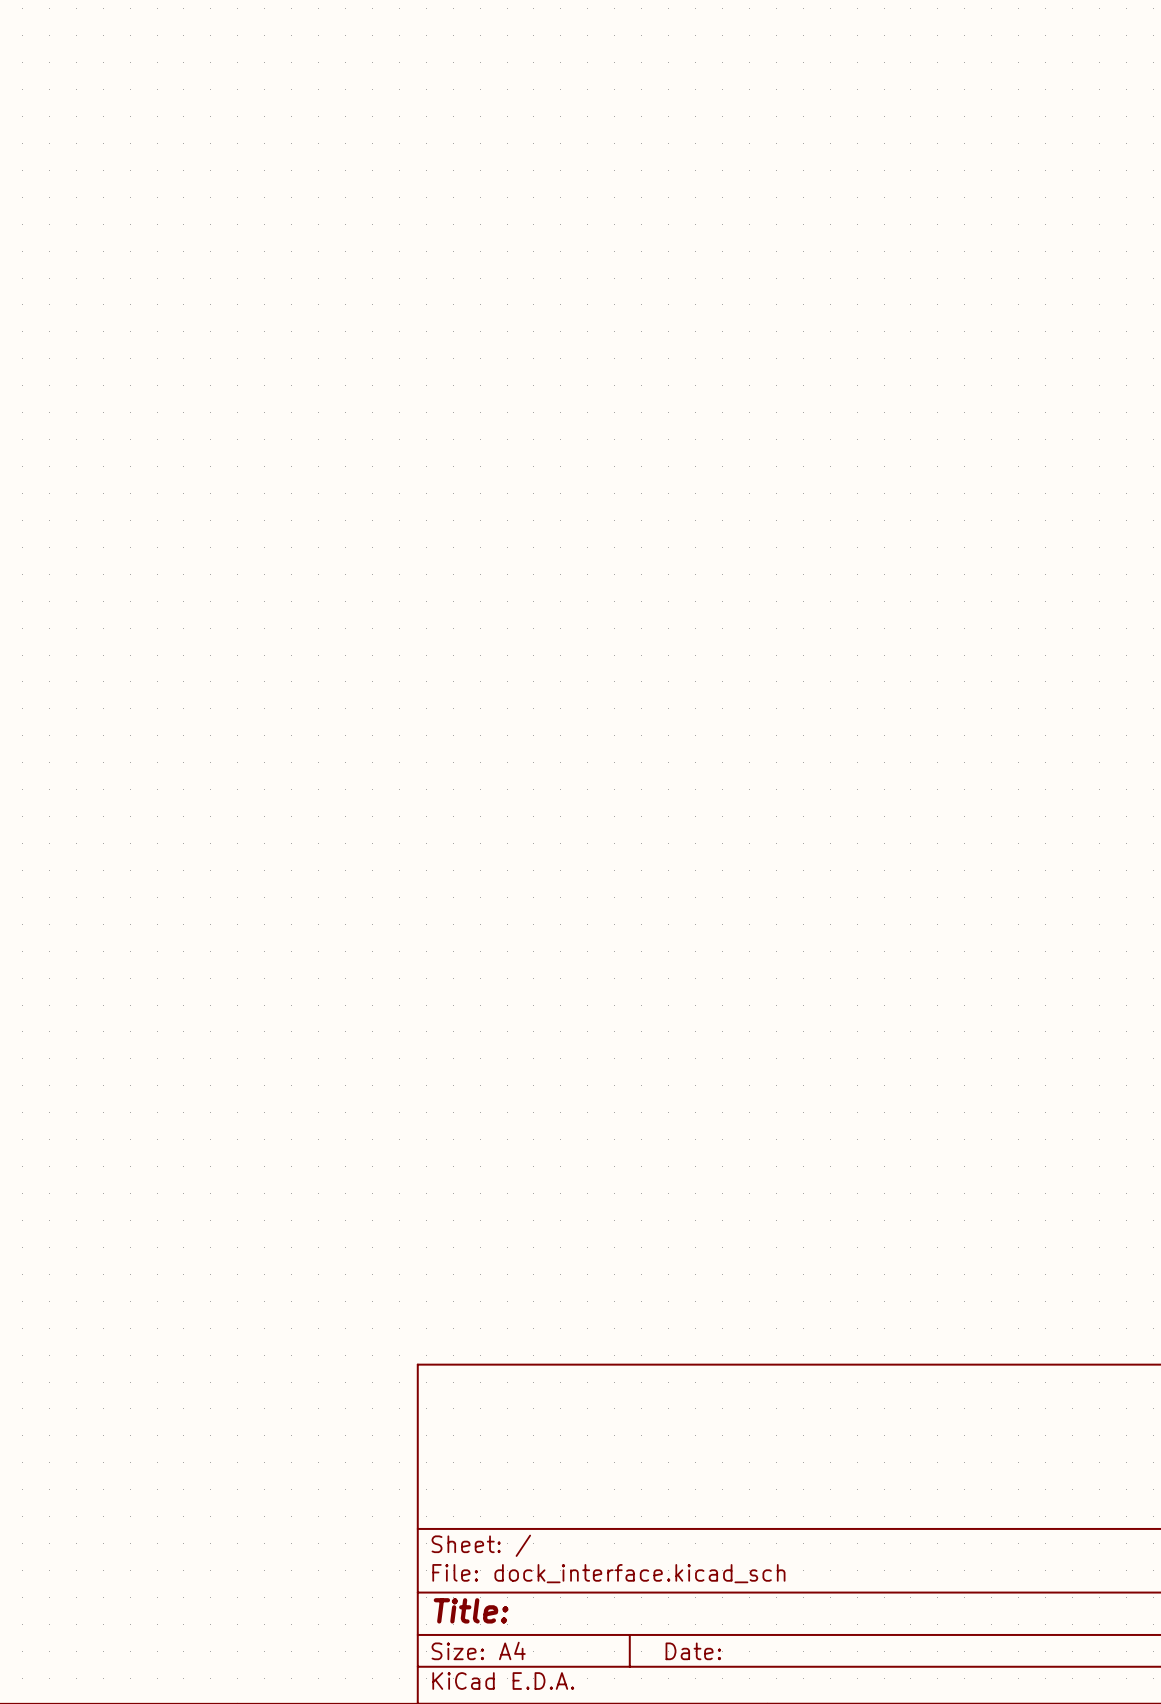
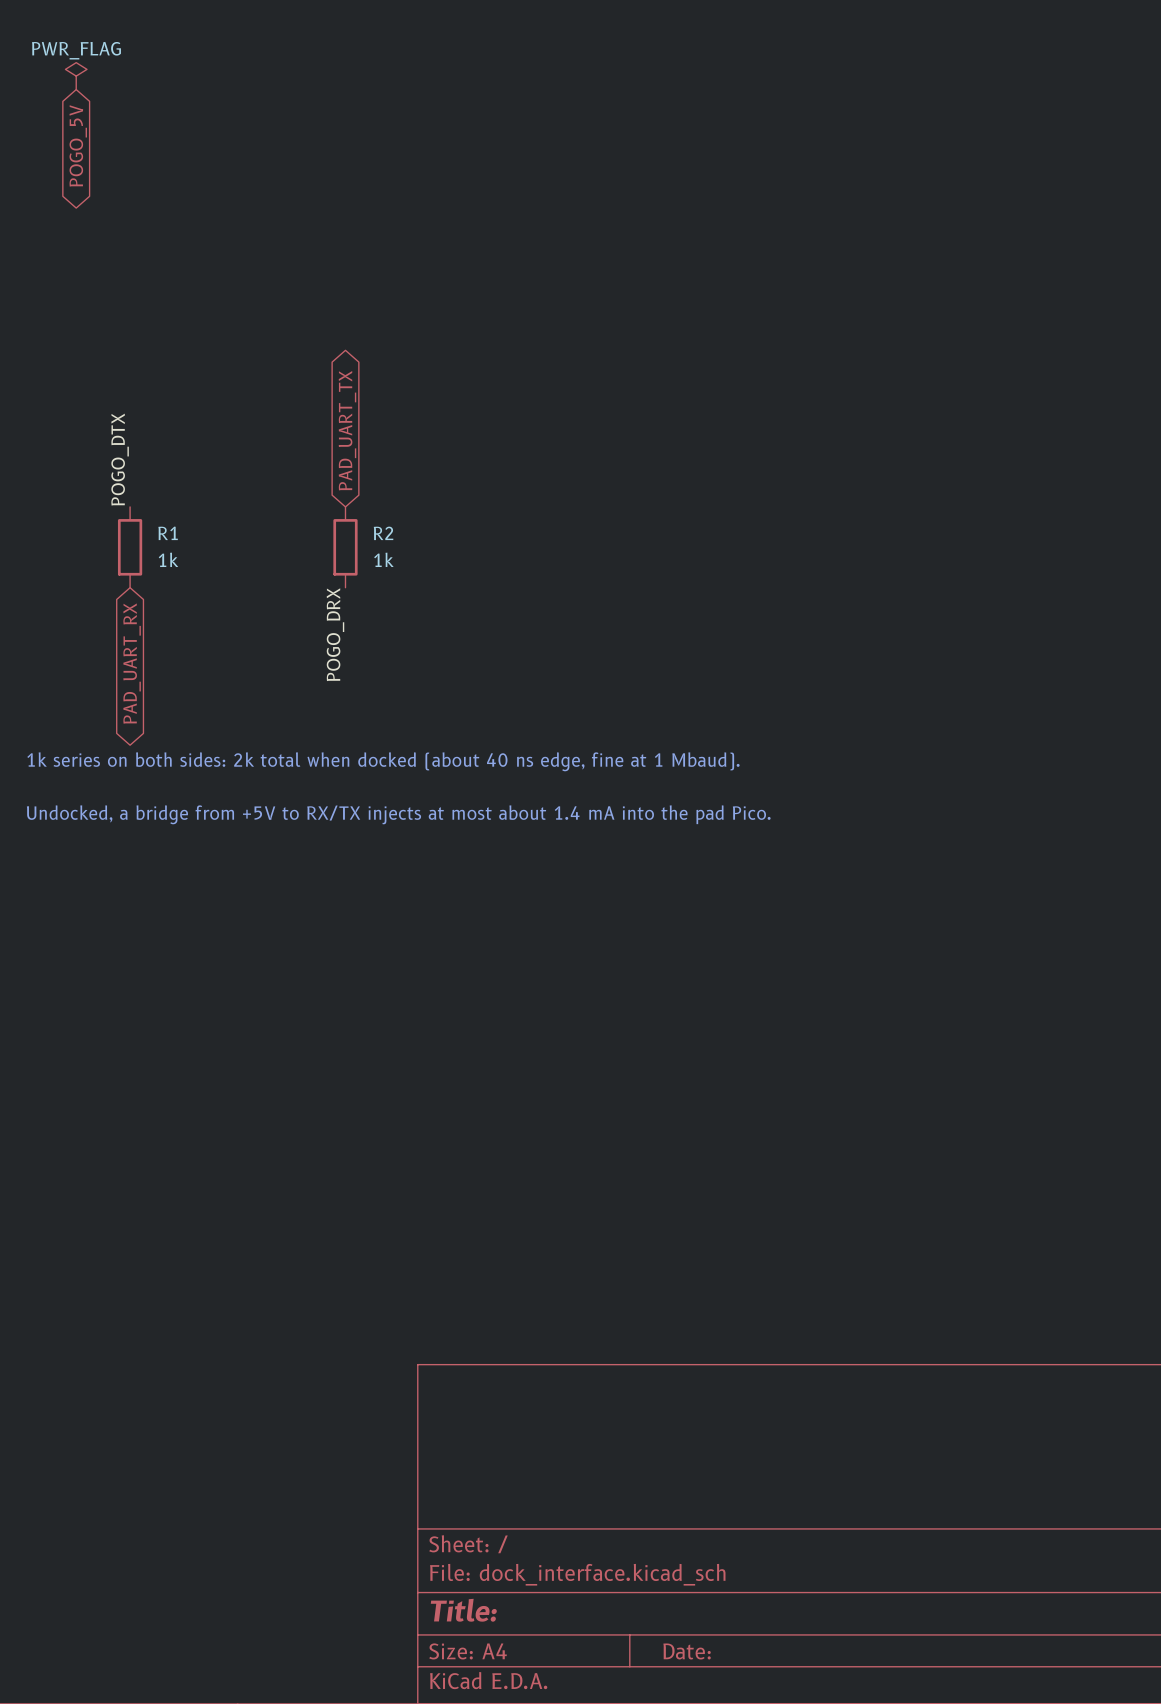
power symbol: none -> PWR_FLAG (76, 76)
global label: none -> POGO_5V (78, 145)
global label: none -> PAD_UART_TX (347, 430)
label: none -> POGO_DTX (120, 459)
R1: none -> 1k (130, 547)
R2: none -> 1k (345, 547)
label: none -> POGO_DRX (335, 634)
global label: none -> PAD_UART_RX (132, 663)
text: none -> 1k series on both sides: 2k total when docked (about 40 ns edge, fine at 1 Mbaud). (383, 761)
text: none -> Undocked, a bridge from +5V to RX/TX injects at most about 1.4 mA into the pad Pico. (398, 814)

